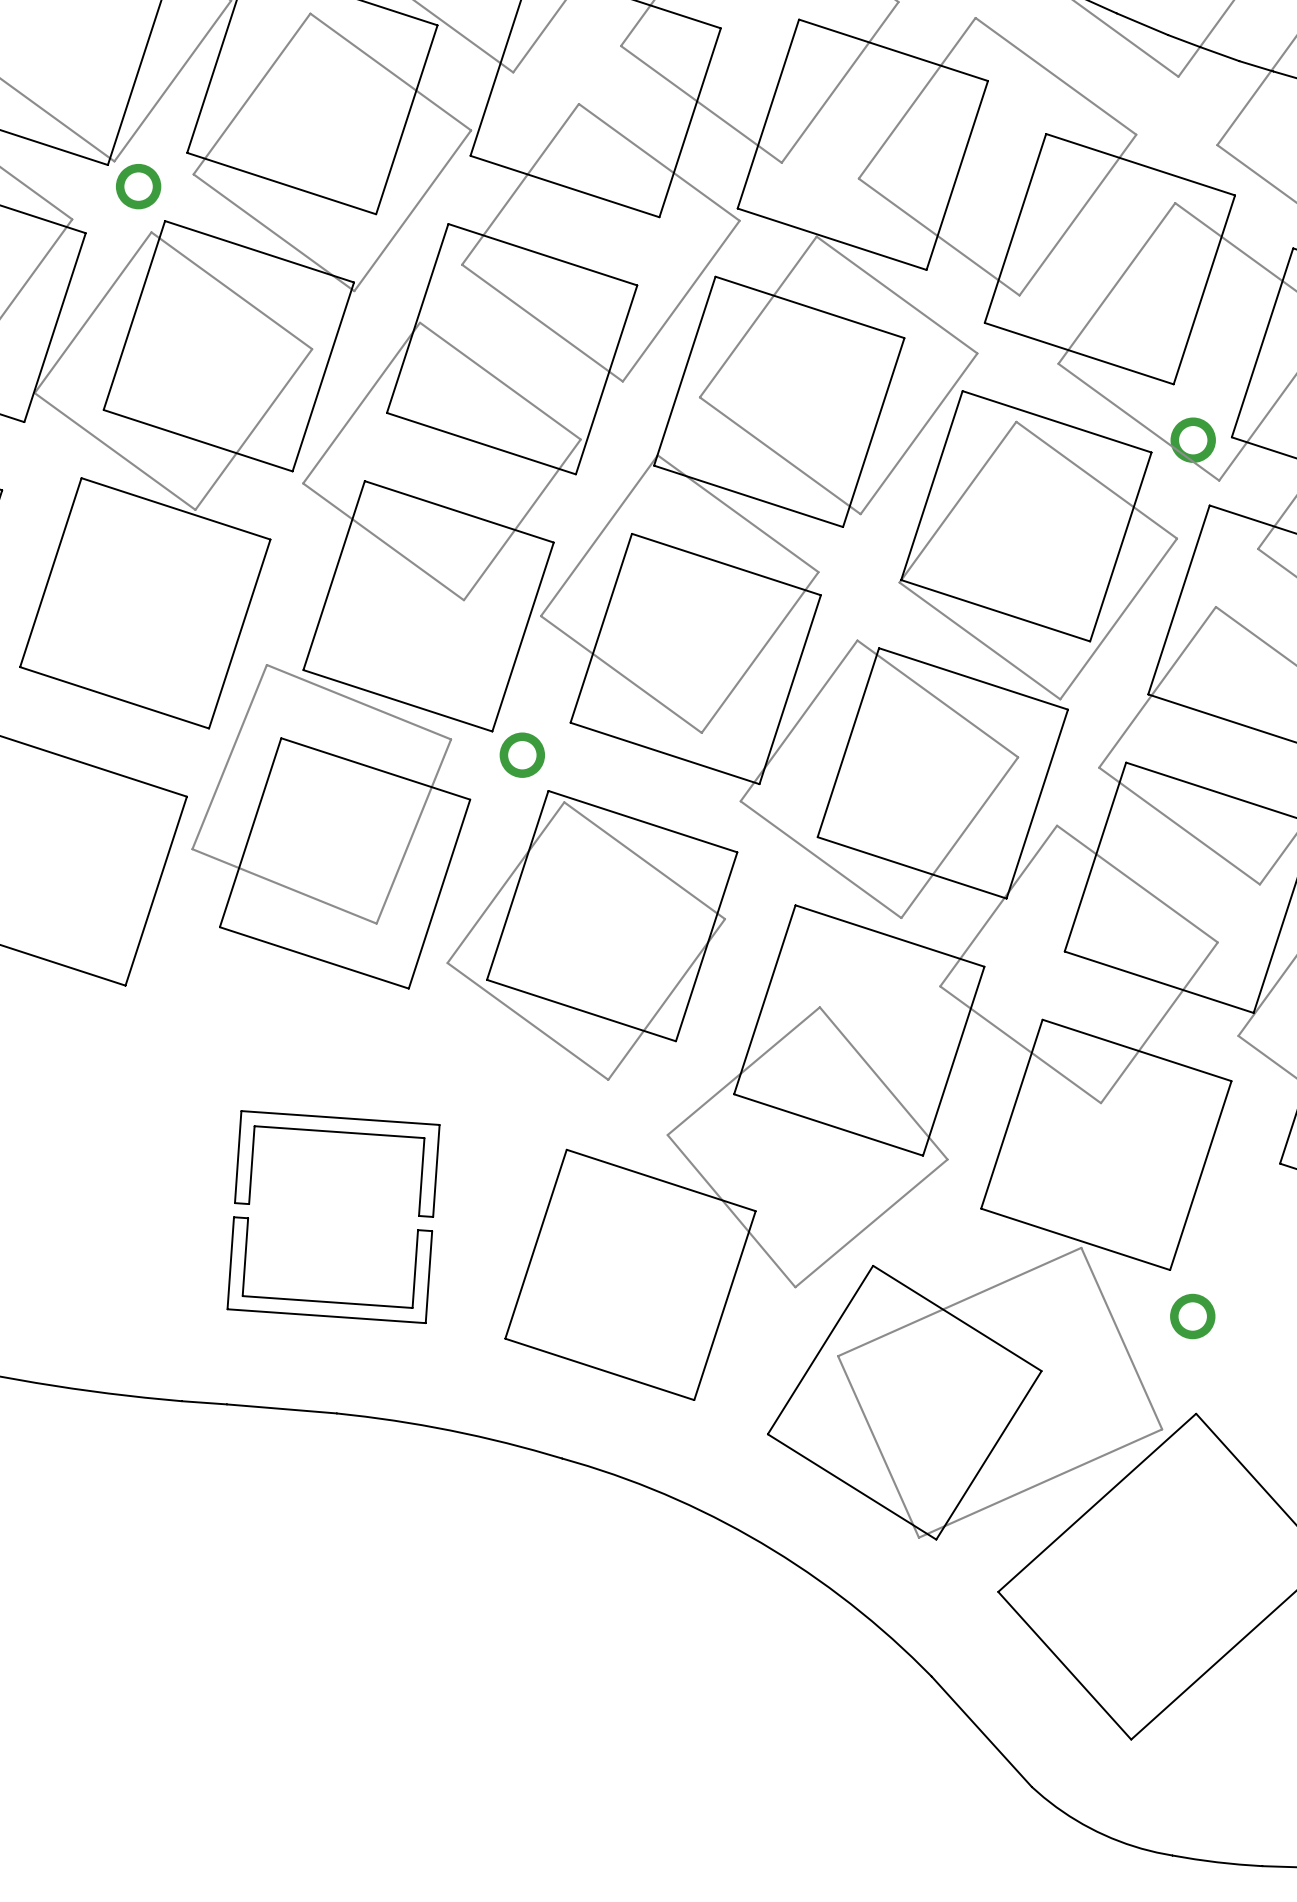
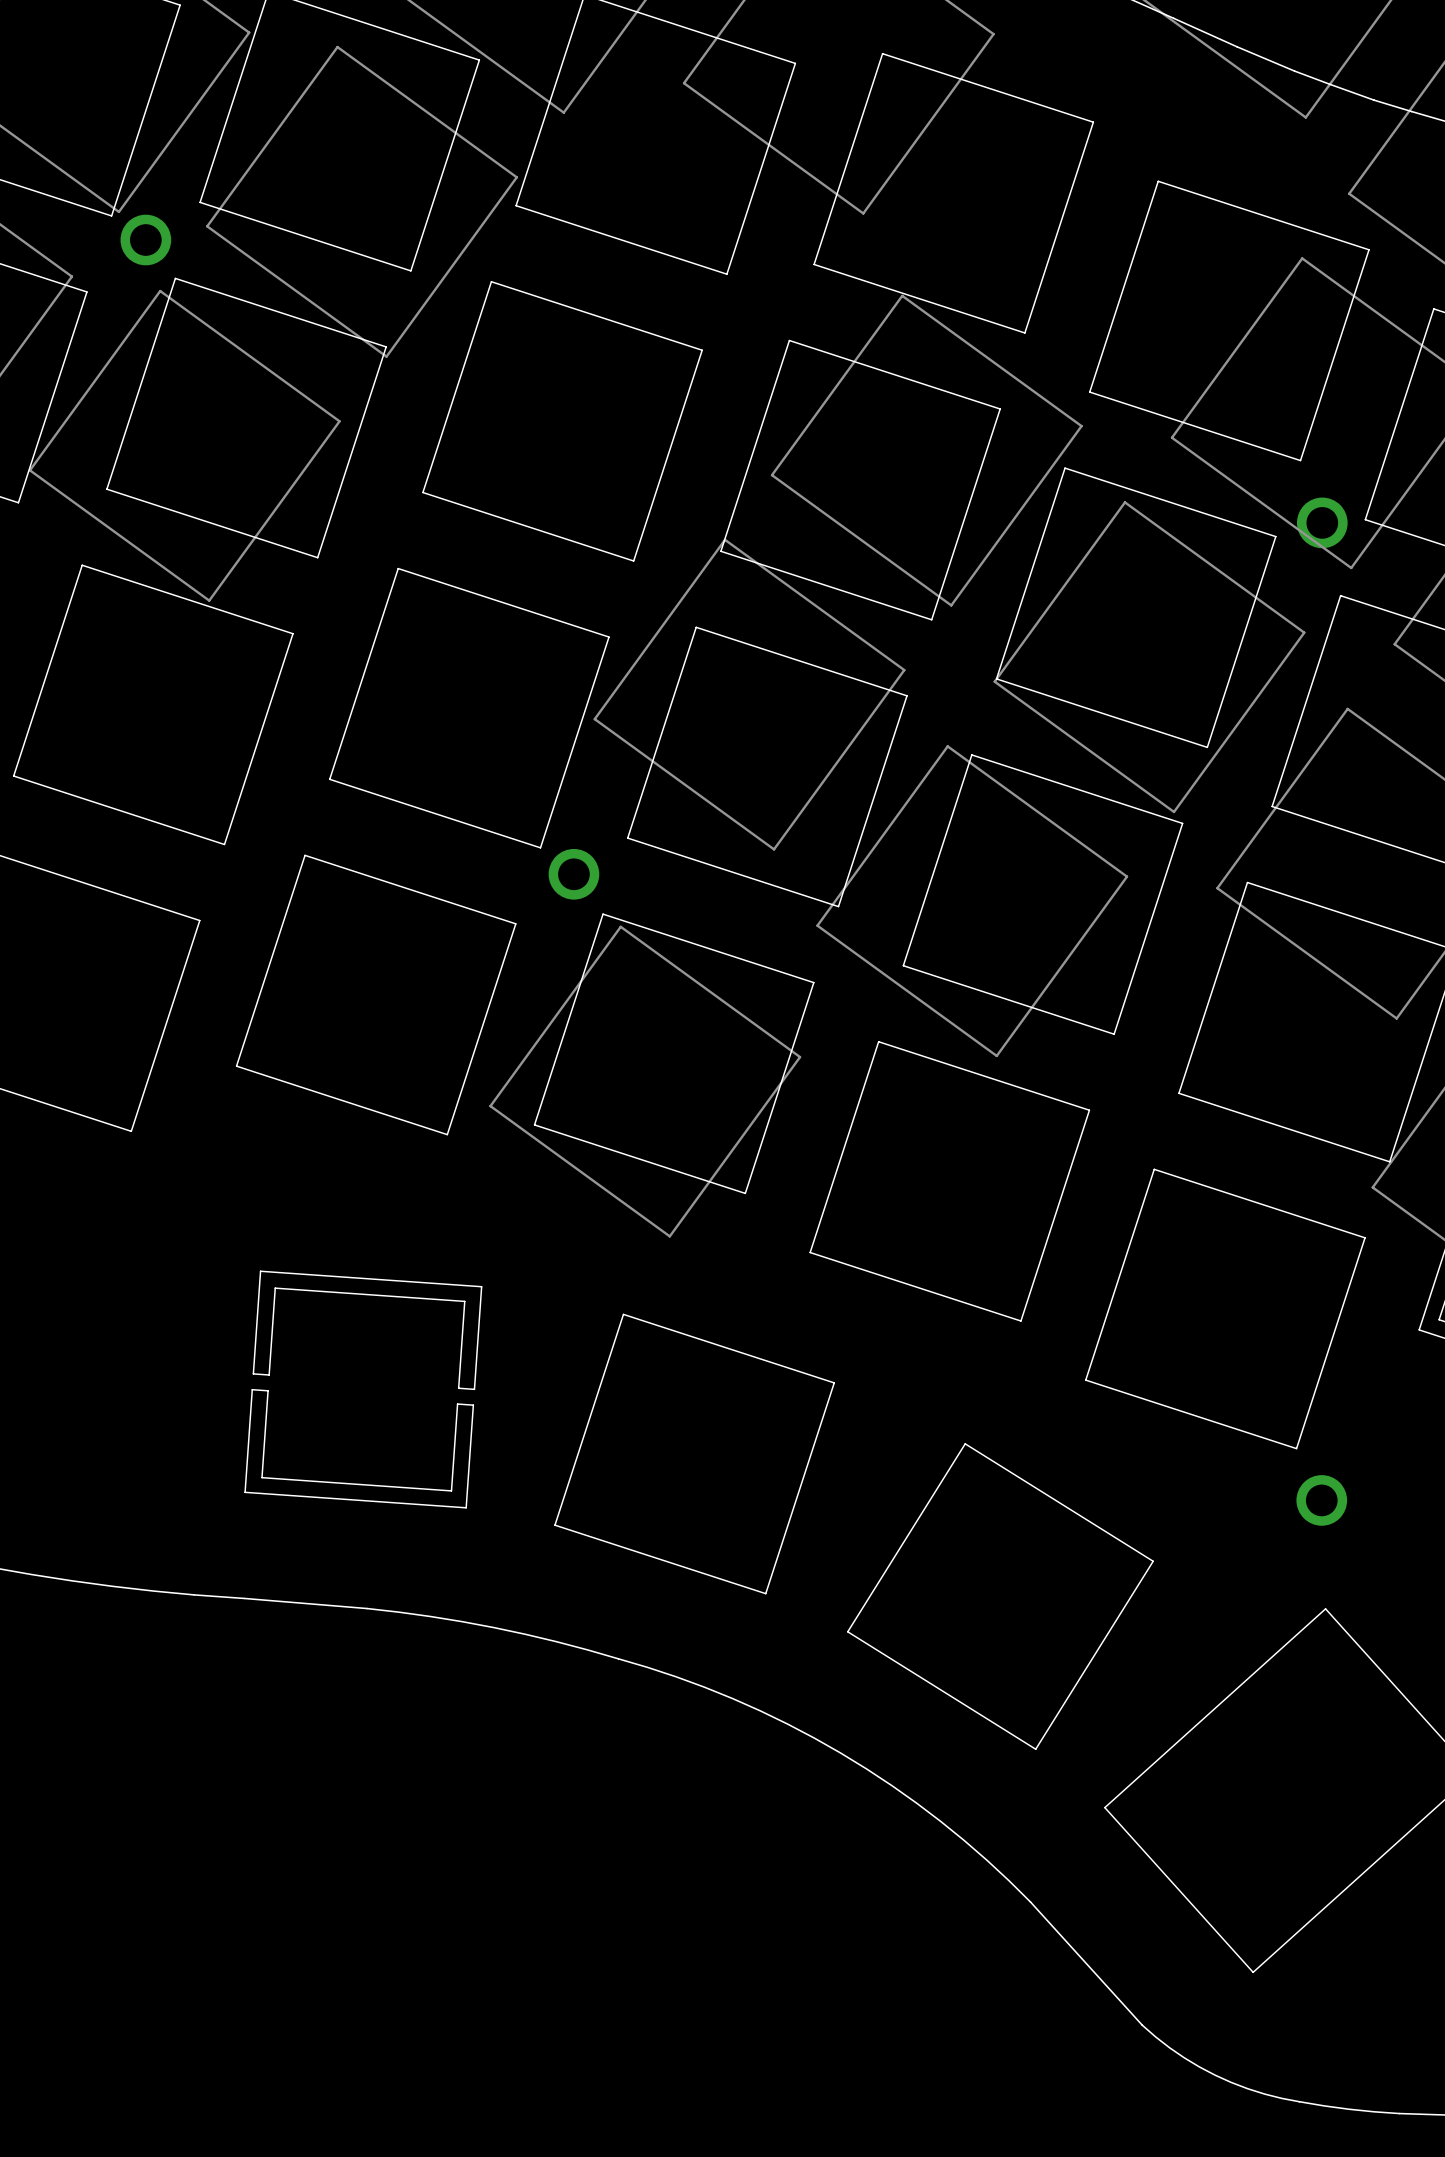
line: (975, 17) (858, 178) (1019, 295) (1136, 134) (975, 17) -> none
line: (578, 104) (739, 220) (622, 381) (462, 264) (578, 104) -> none
line: (420, 322) (580, 439) (463, 600) (303, 483) (420, 322) -> none
line: (266, 664) (451, 739) (376, 923) (192, 849) (266, 664) -> none
line: (1057, 825) (940, 986) (1101, 1103) (1217, 942) (1057, 825) -> none
line: (819, 1007) (947, 1159) (795, 1287) (667, 1135) (819, 1007) -> none
line: (1081, 1247) (838, 1356) (918, 1537) (1162, 1429) (1081, 1247) -> none

